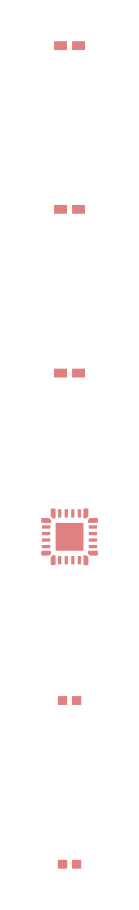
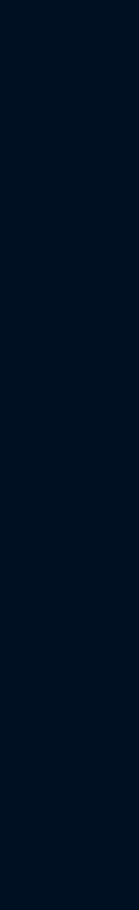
part: (69, 45) -> none
part: (69, 209) -> none
part: (69, 373) -> none
part: (69, 536) -> none
part: (69, 700) -> none
part: (69, 864) -> none

